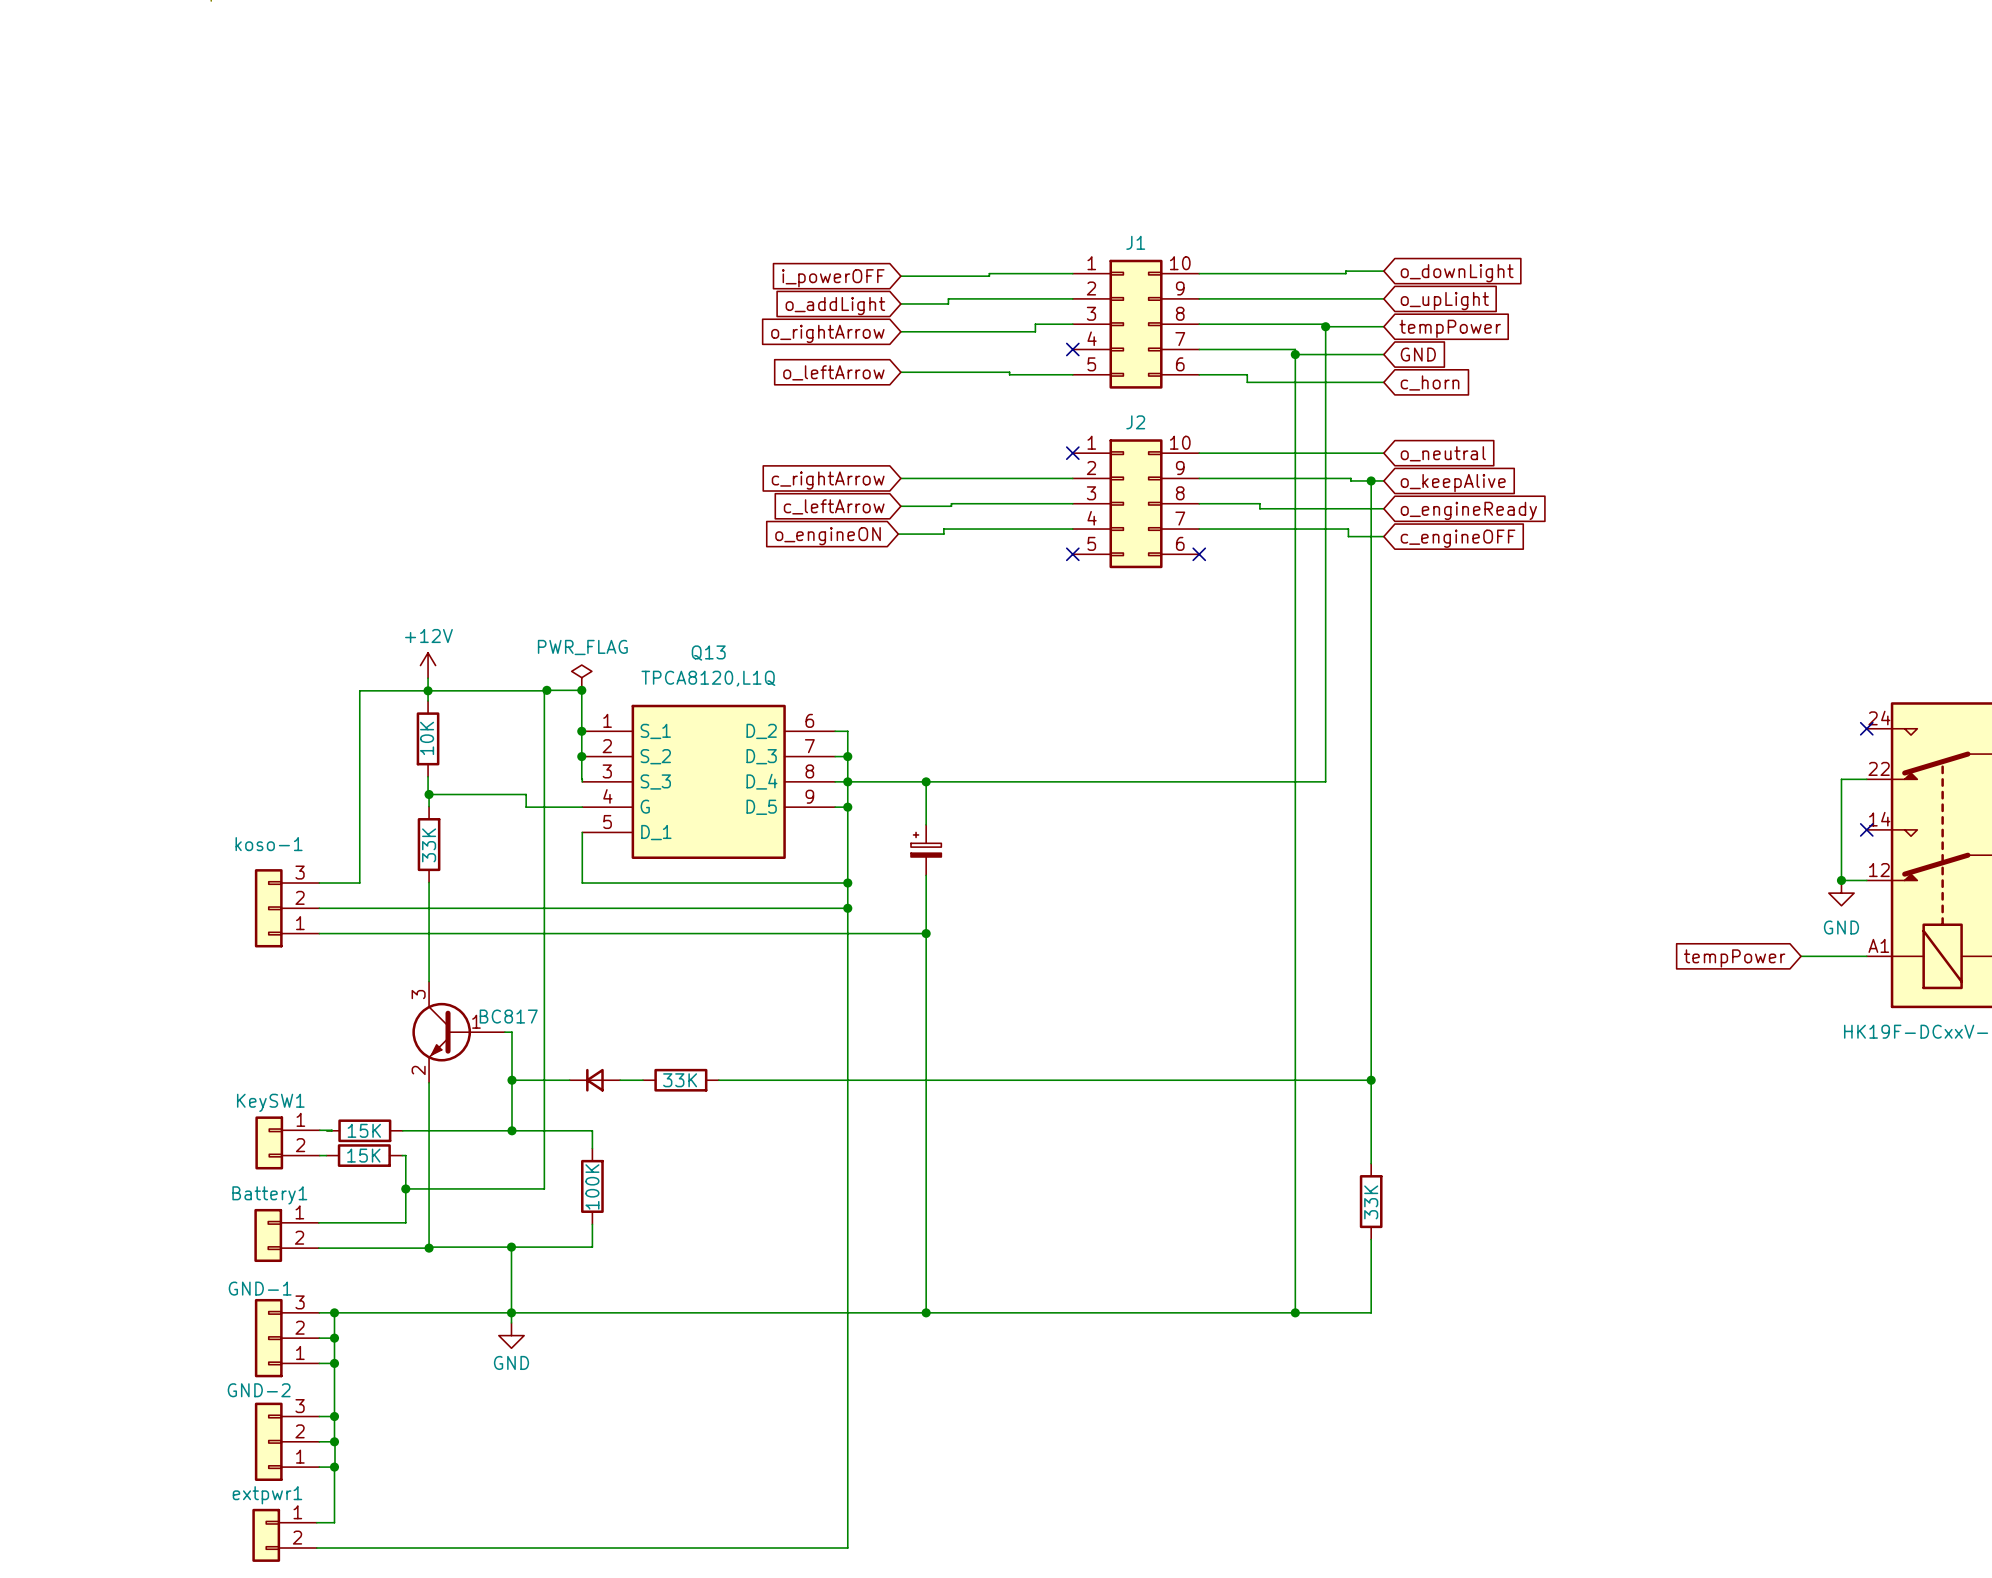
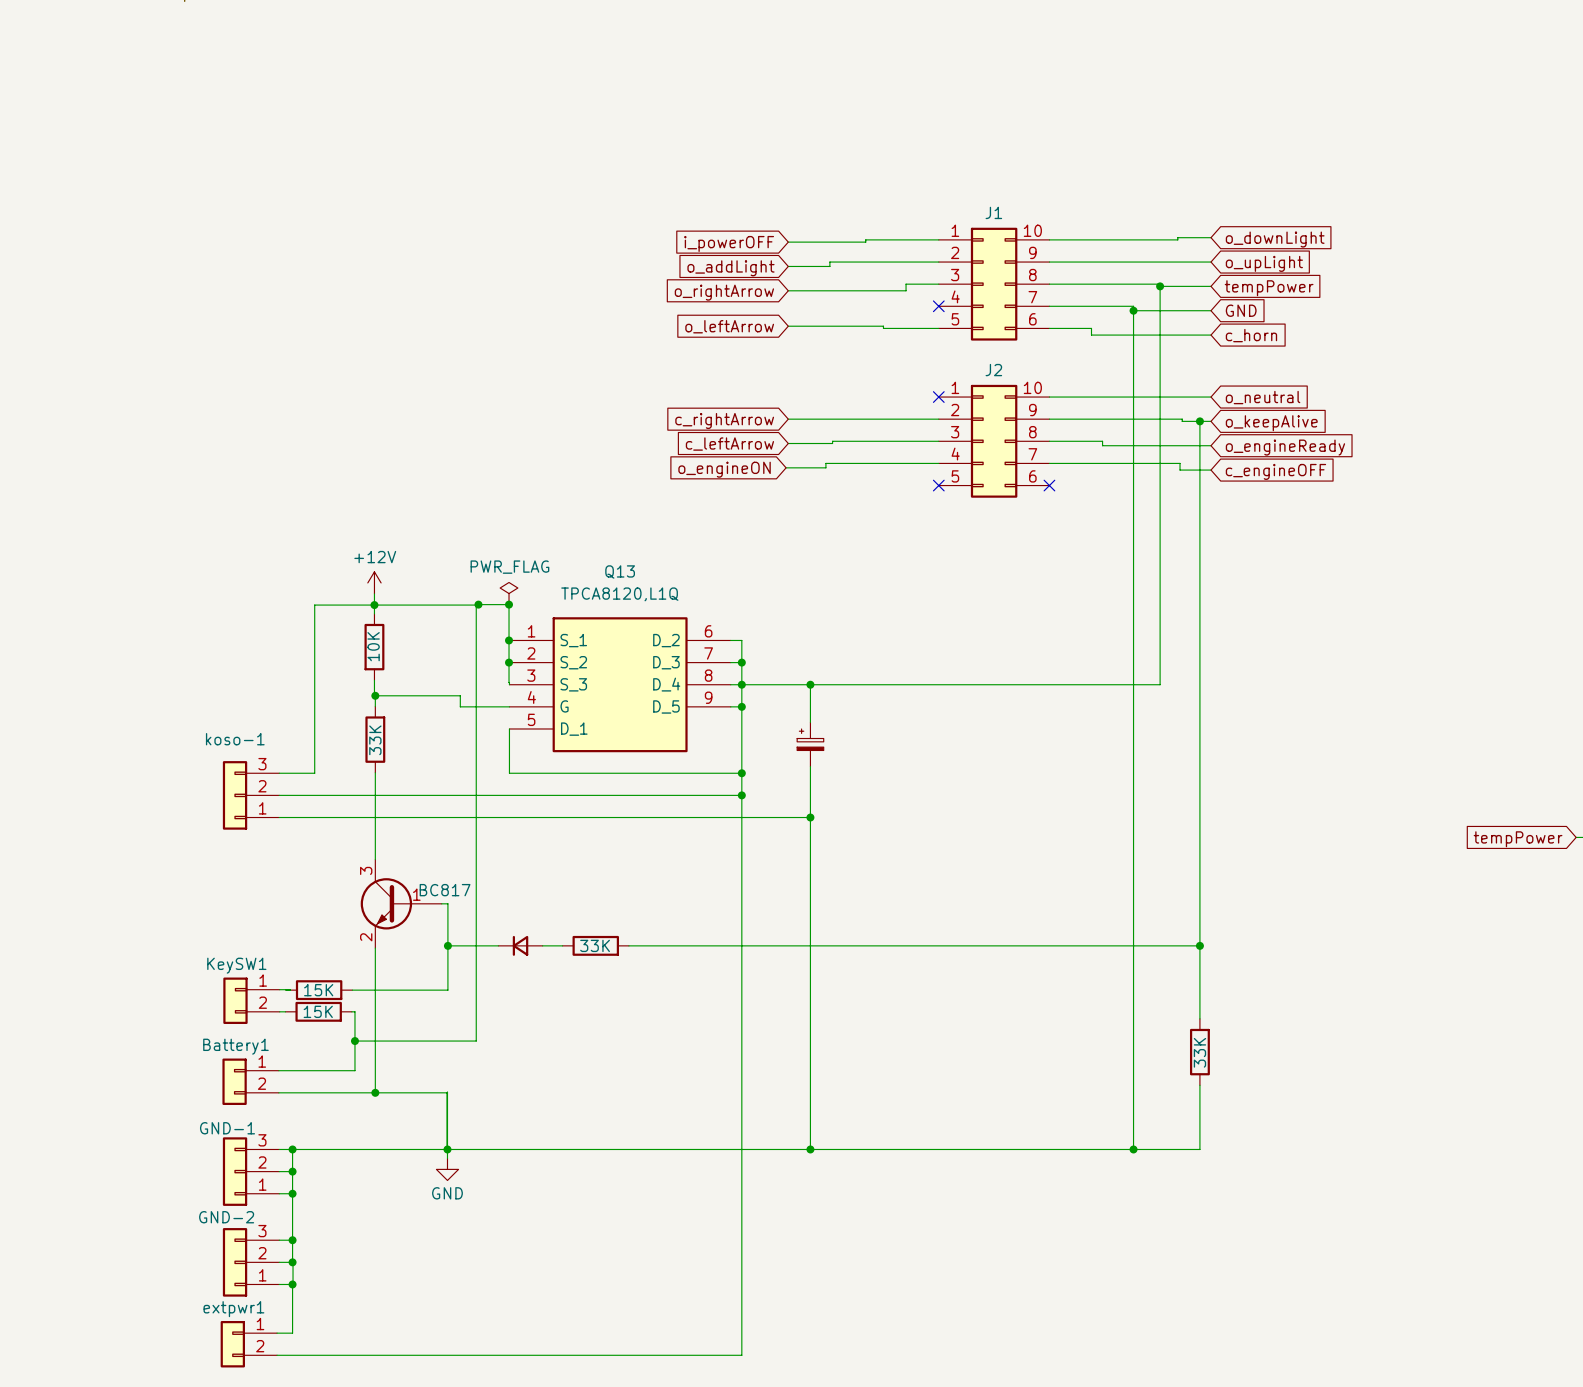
wire: (511, 1130) (592, 1130) (592, 1148) -> none
junction: (511, 1130) -> none
part: 100K (592, 1186) -> none
wire: (592, 1224) (592, 1247) (429, 1248) -> (447, 1149) (447, 1092) (375, 1092)
junction: (511, 1247) -> none

